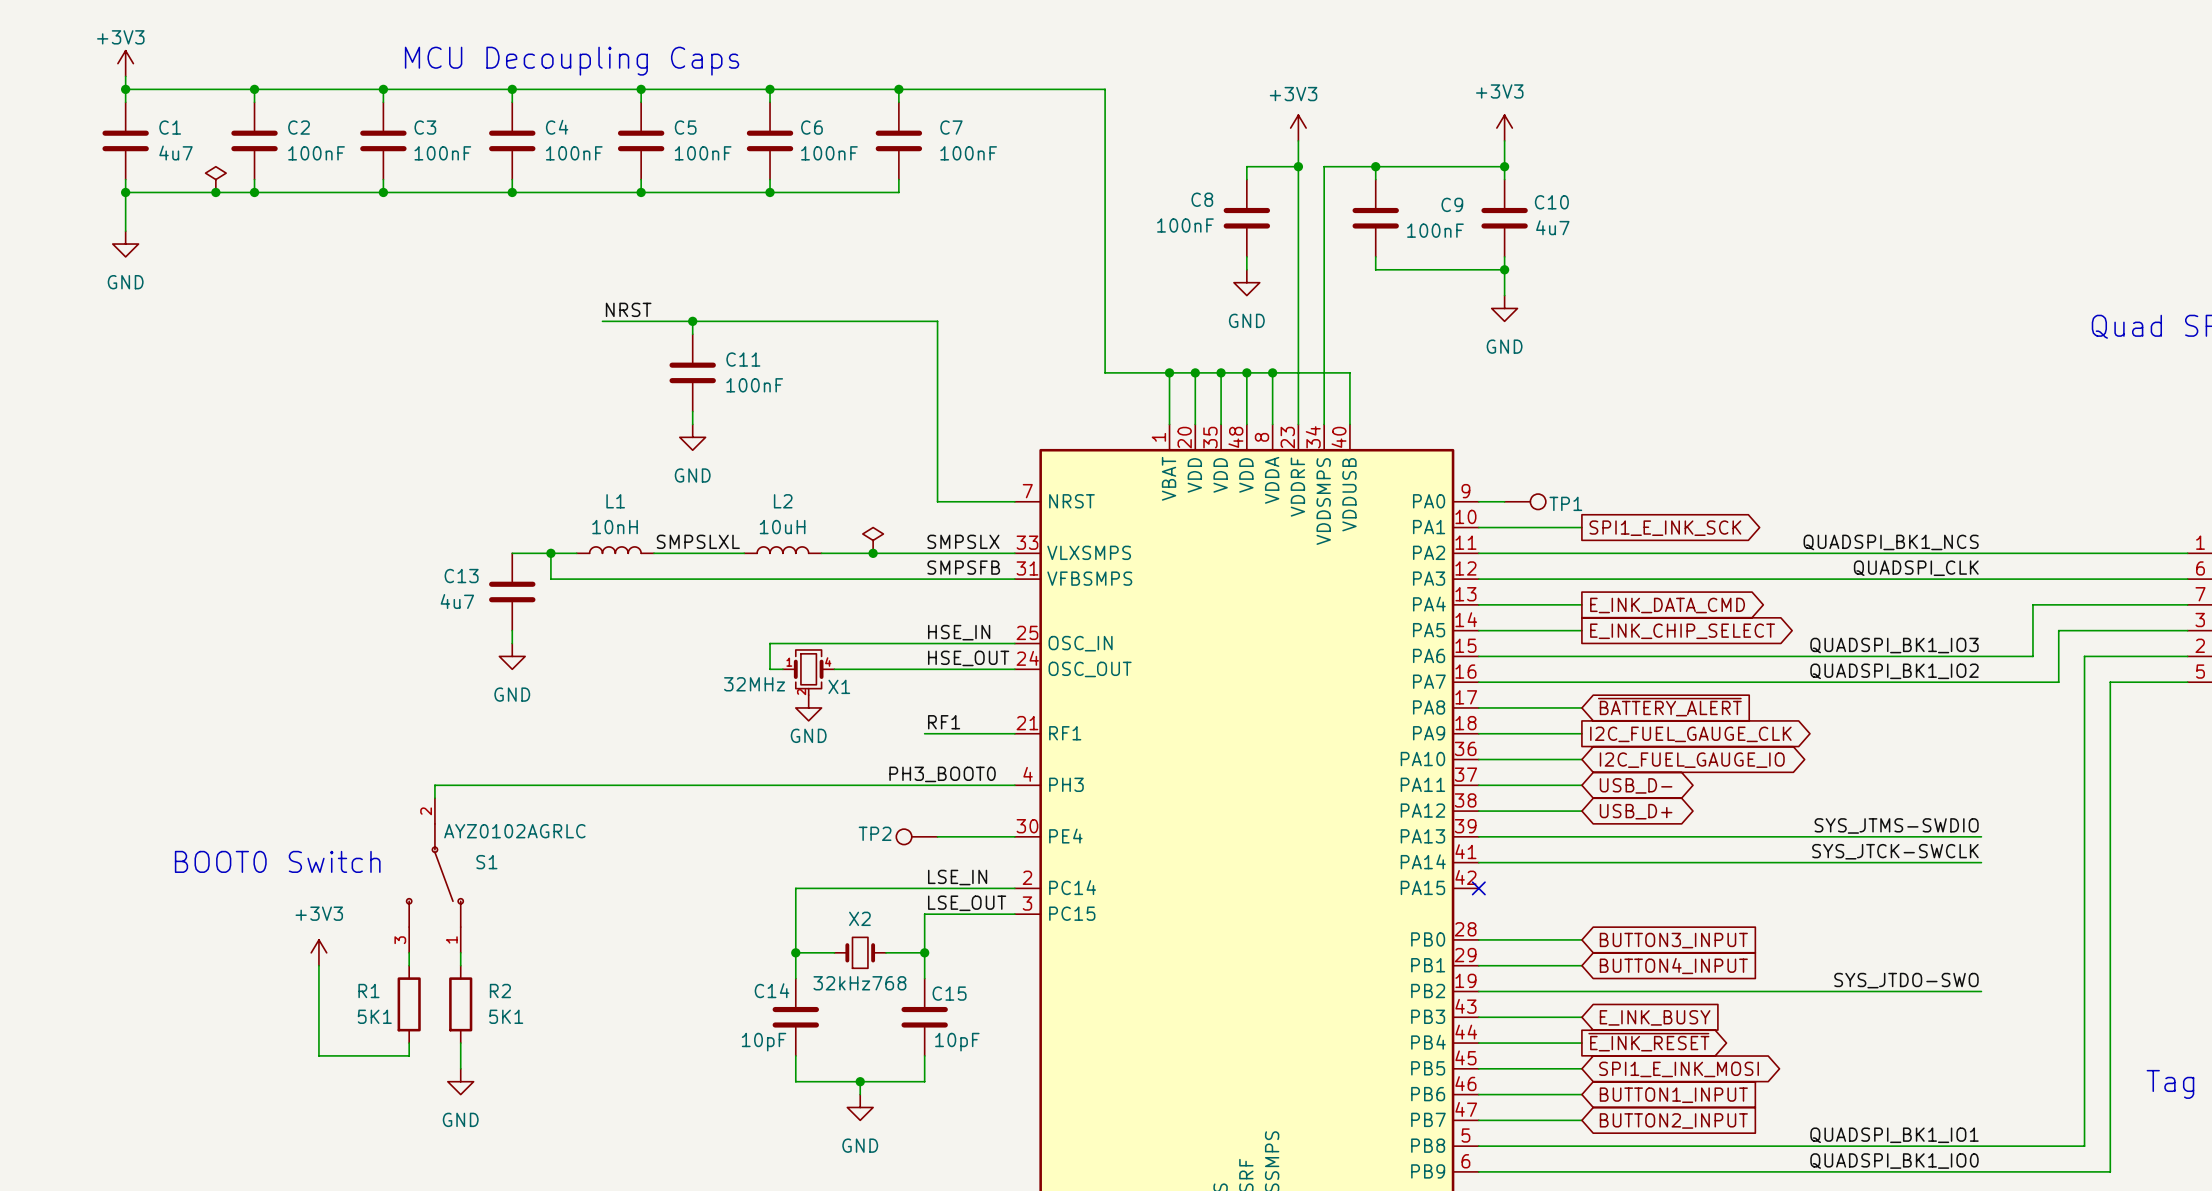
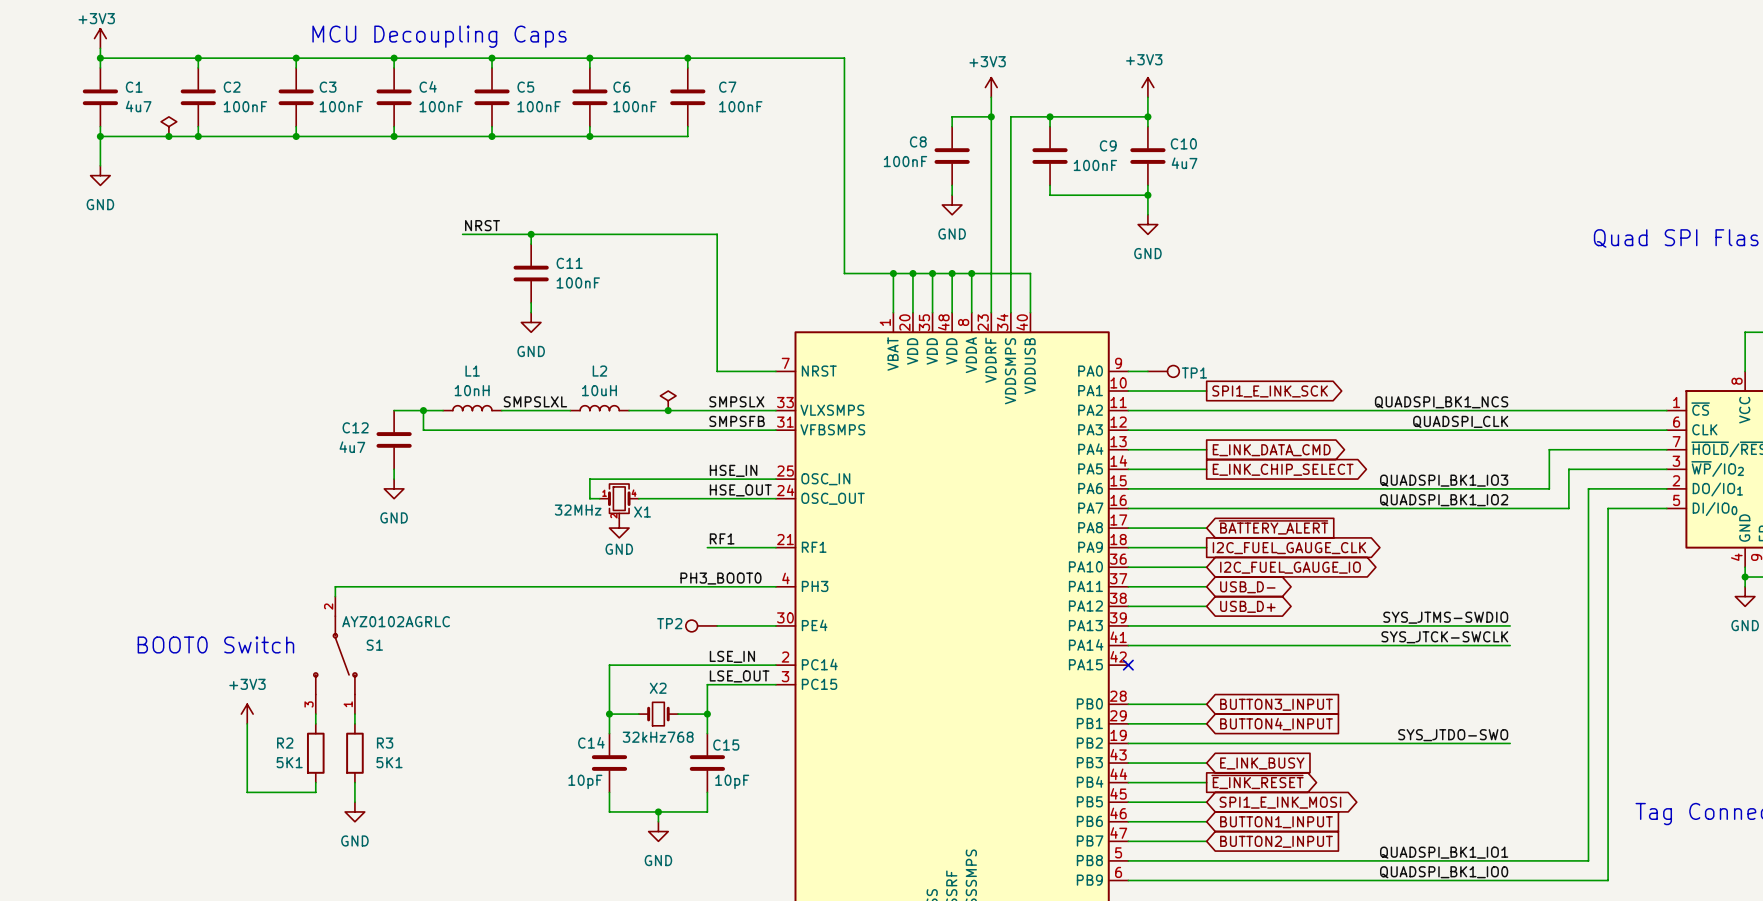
C13 name: C13 (461, 576) -> C12 (355, 427)
R1 name: R1 (368, 991) -> R2 (285, 743)
R2 name: R2 (500, 991) -> R3 (385, 743)

